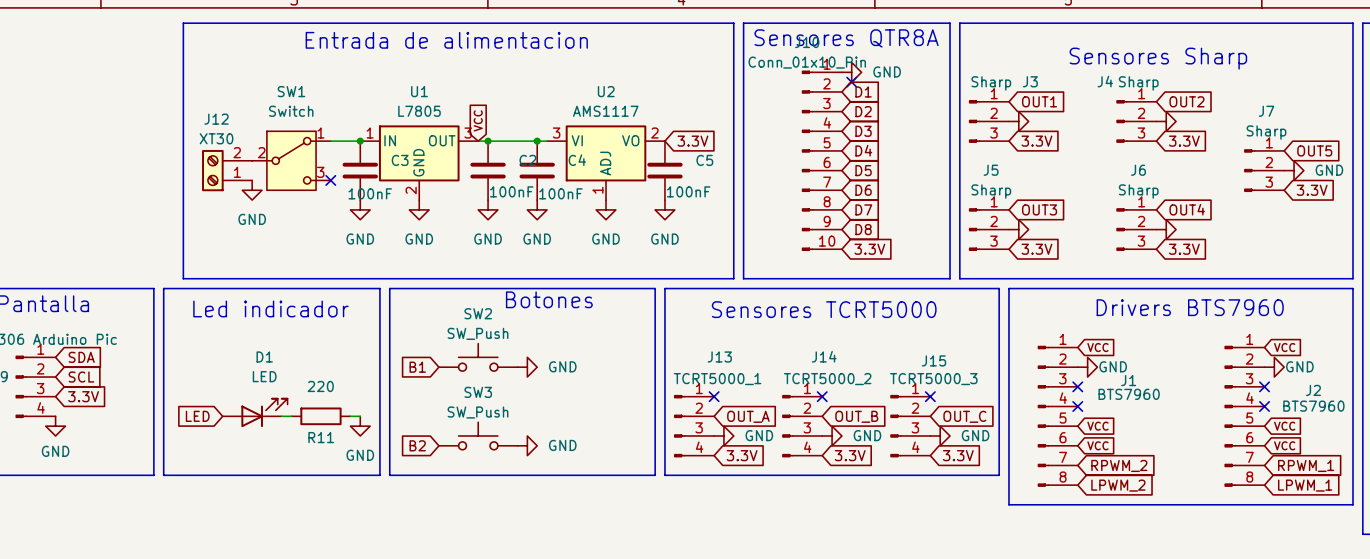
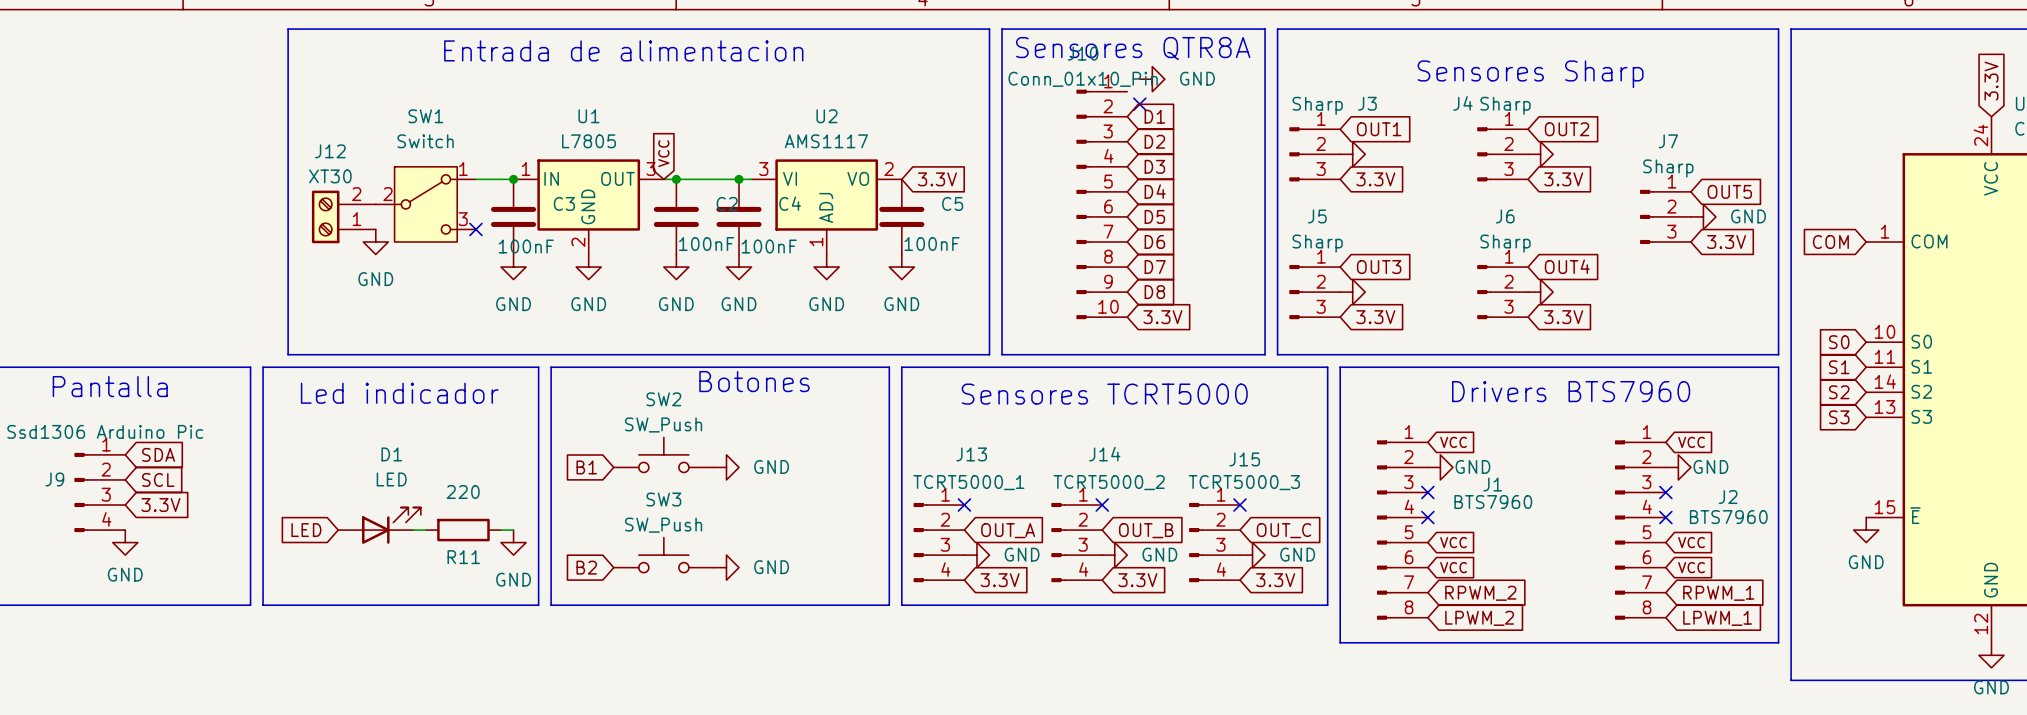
power symbol position: GND (851, 72) -> GND (1152, 79)

